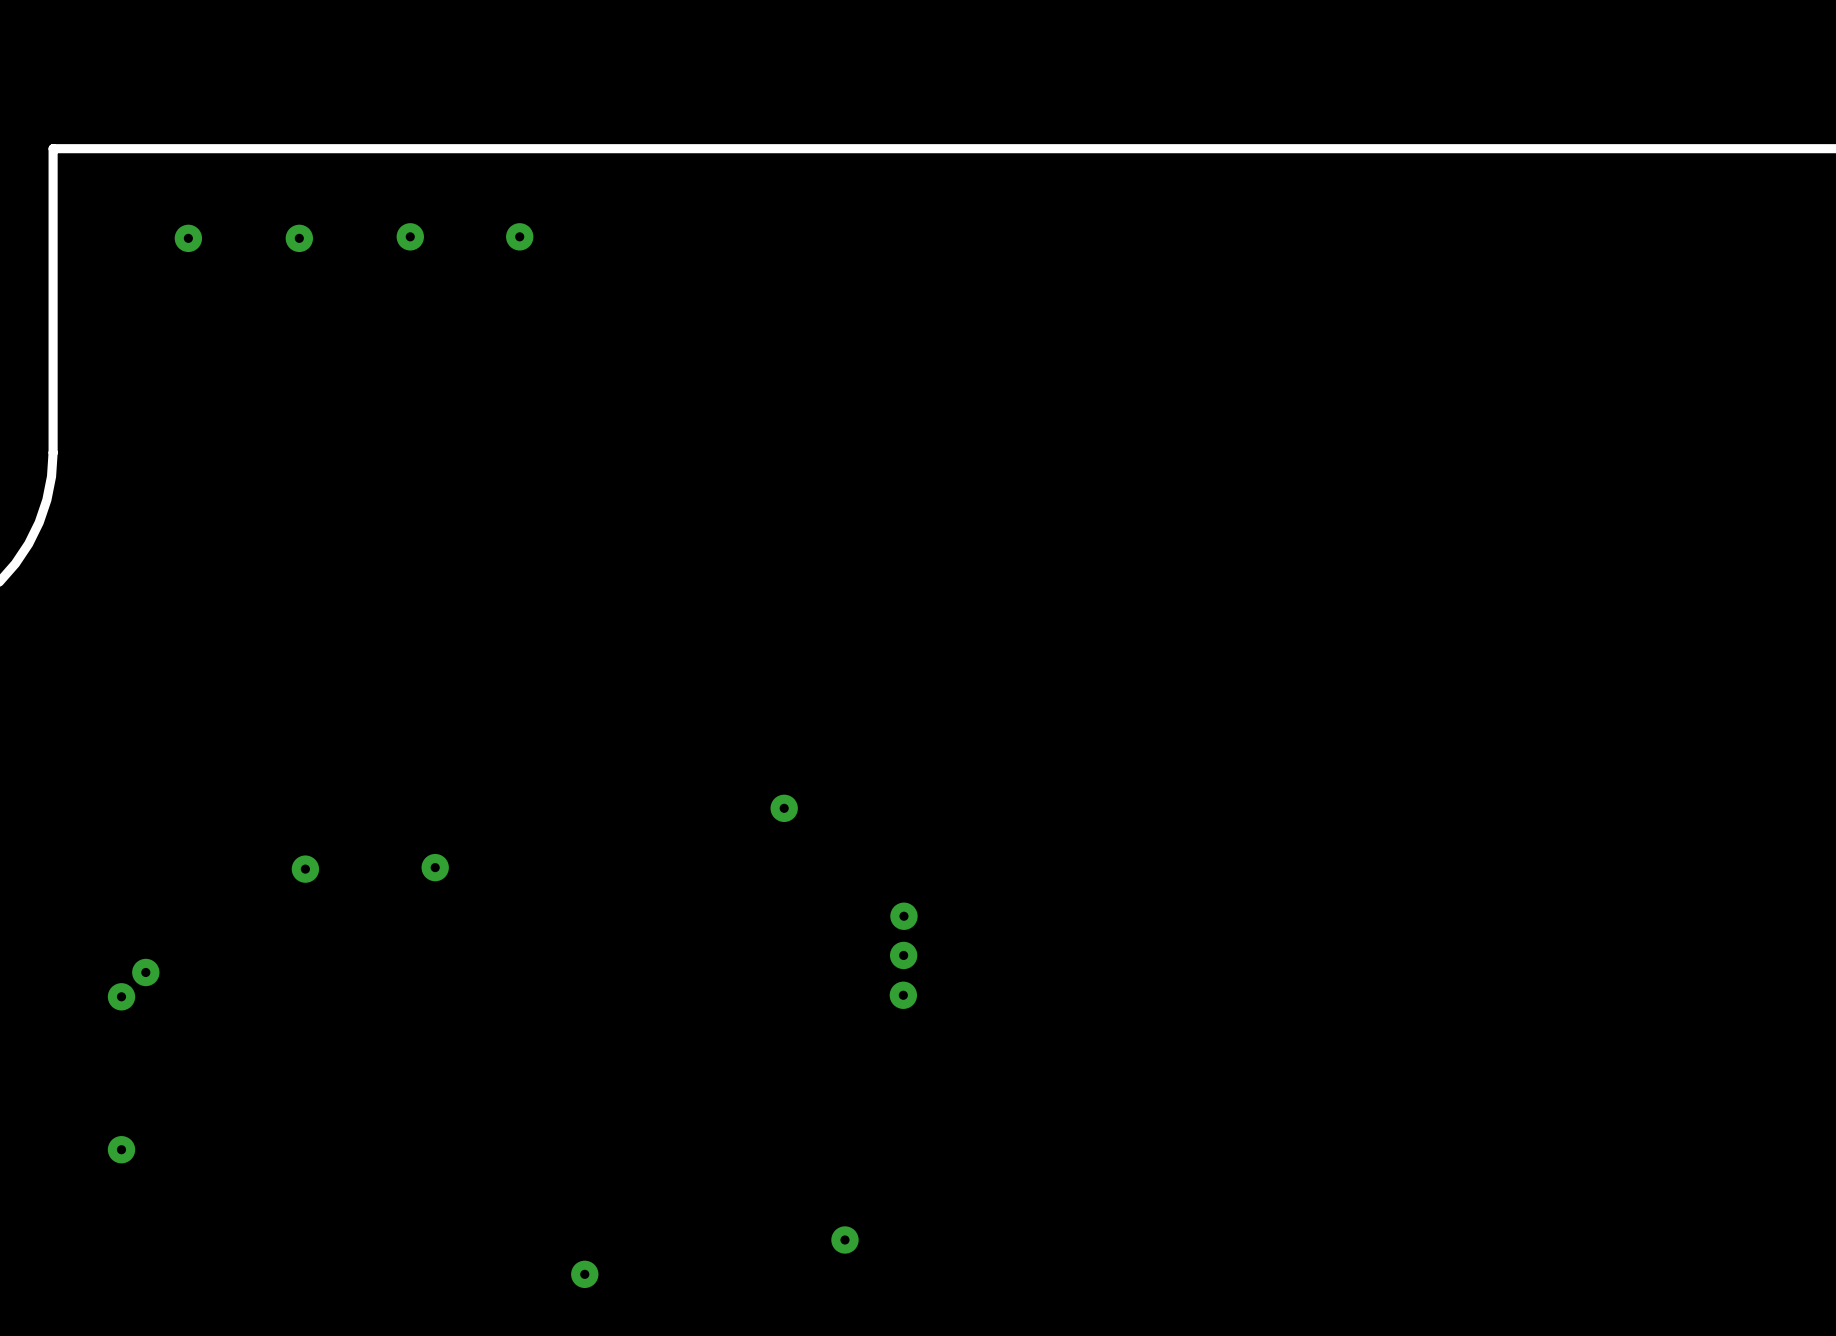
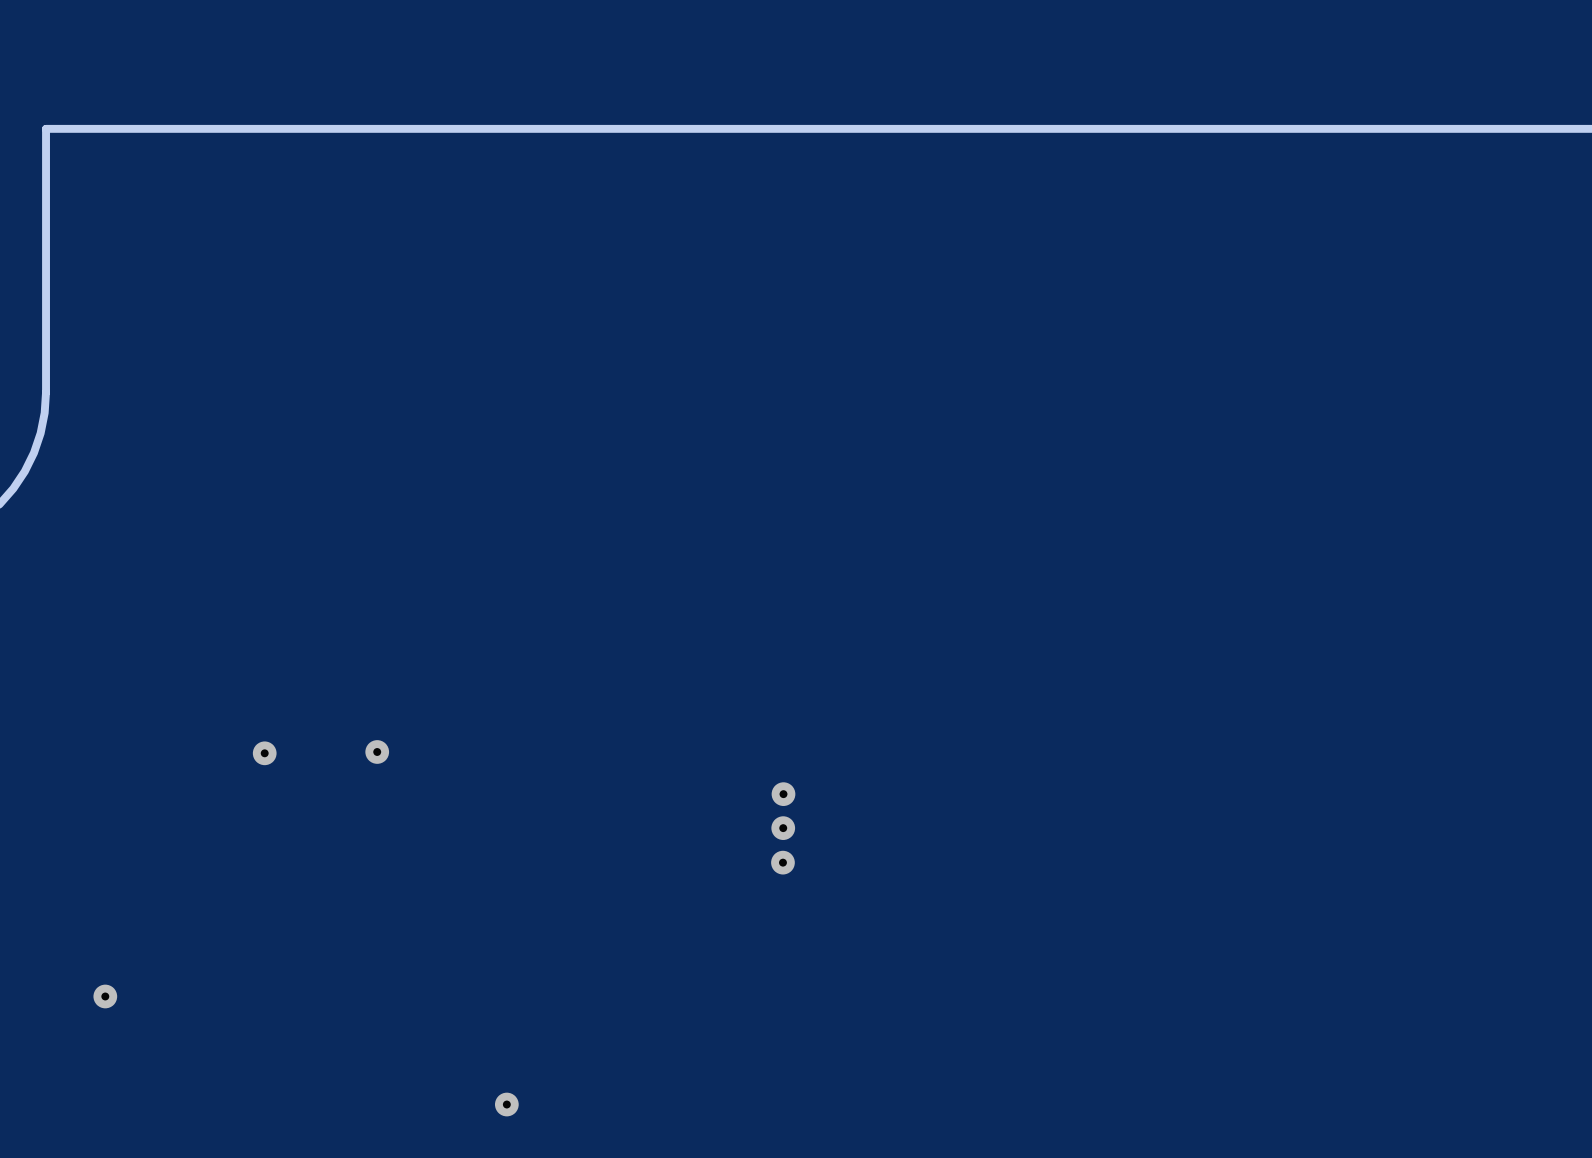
via: (410, 236) -> none
via: (519, 236) -> none
via: (188, 238) -> none
via: (299, 238) -> none
via: (784, 808) -> none
via: (145, 972) -> none
via: (121, 996) -> none
via: (844, 1239) -> none

